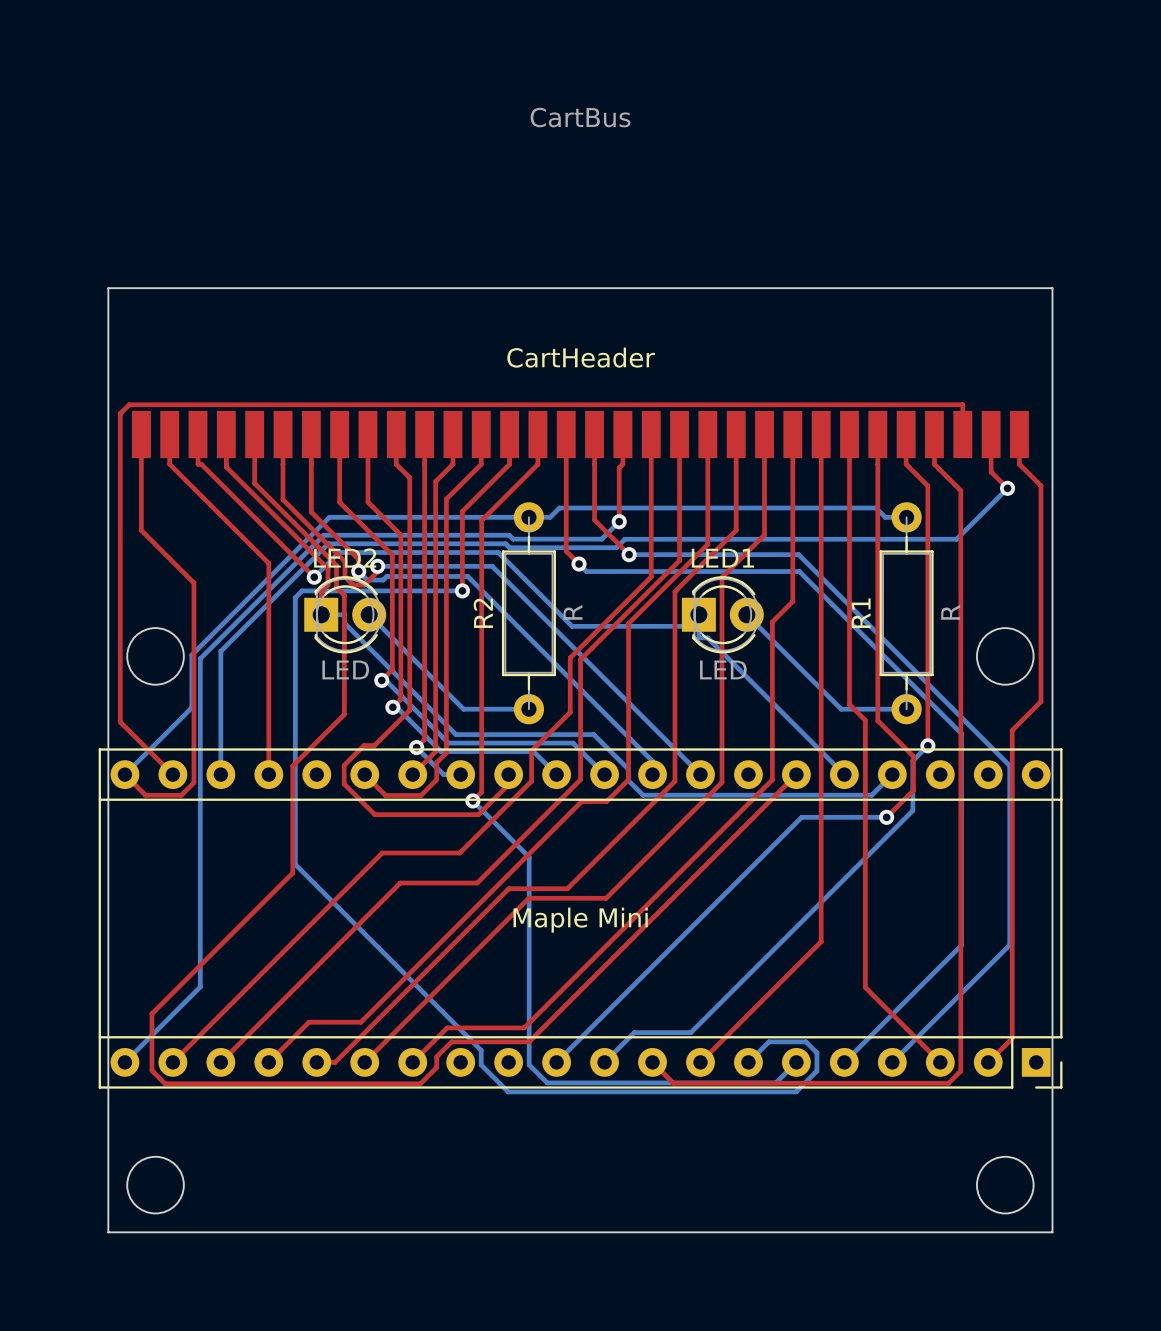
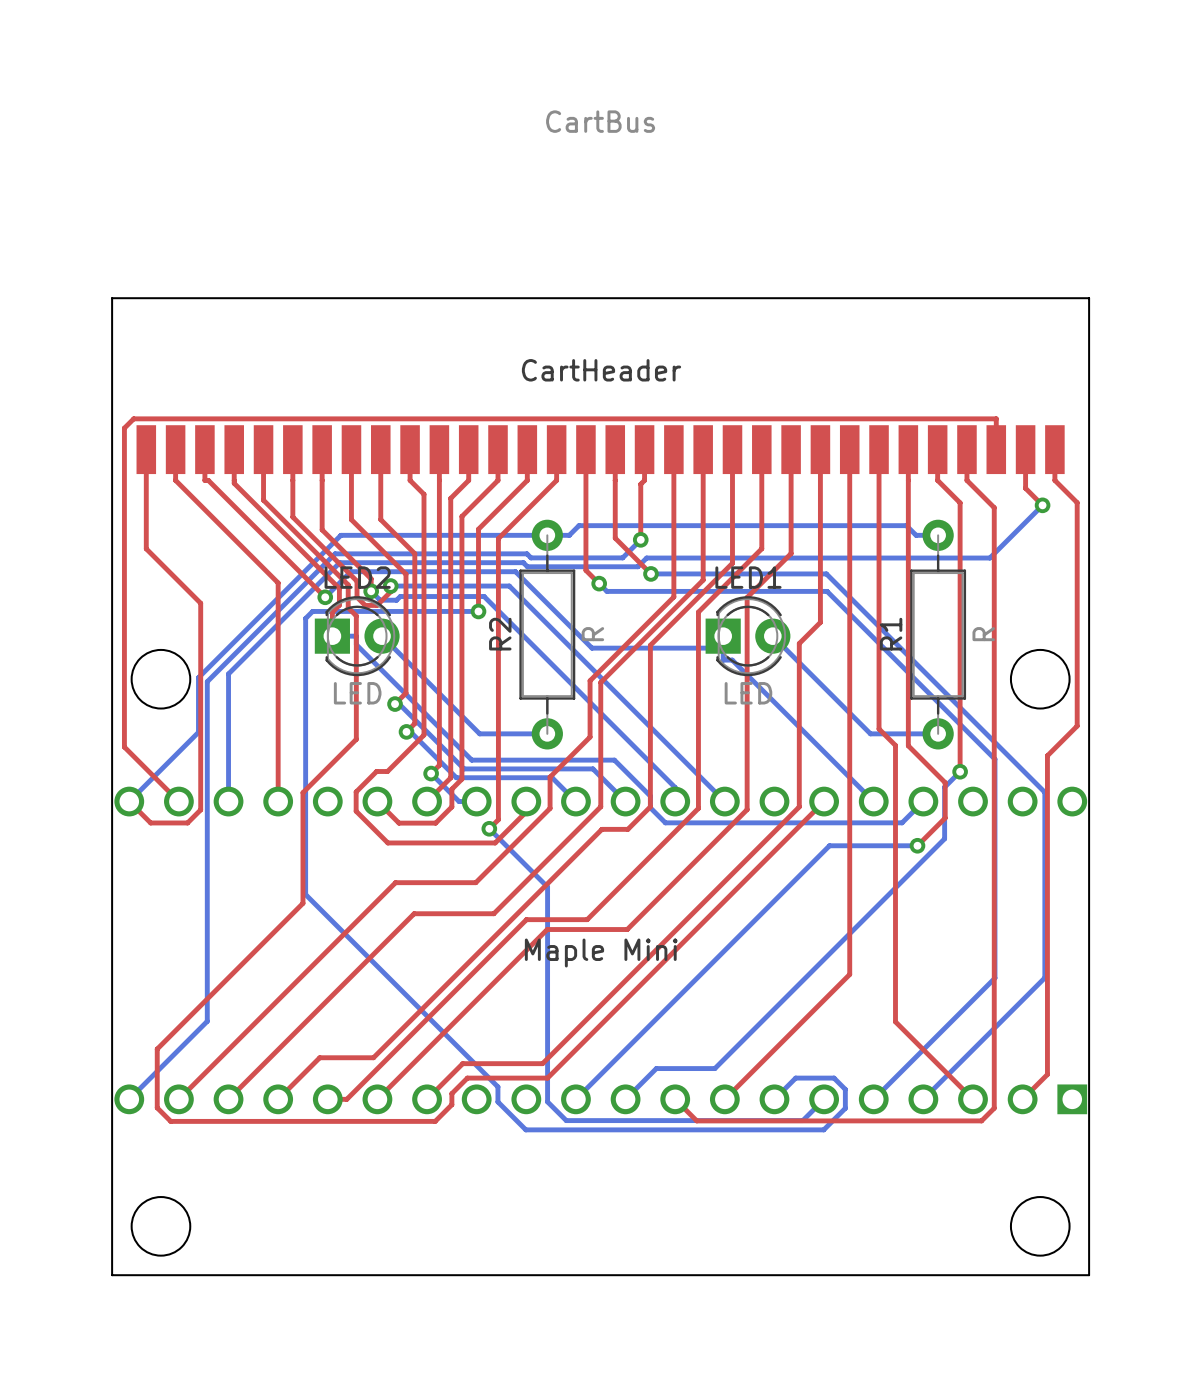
Maple Mini footprint: [98, 748, 1063, 1089] -> [114, 786, 1088, 1115]

